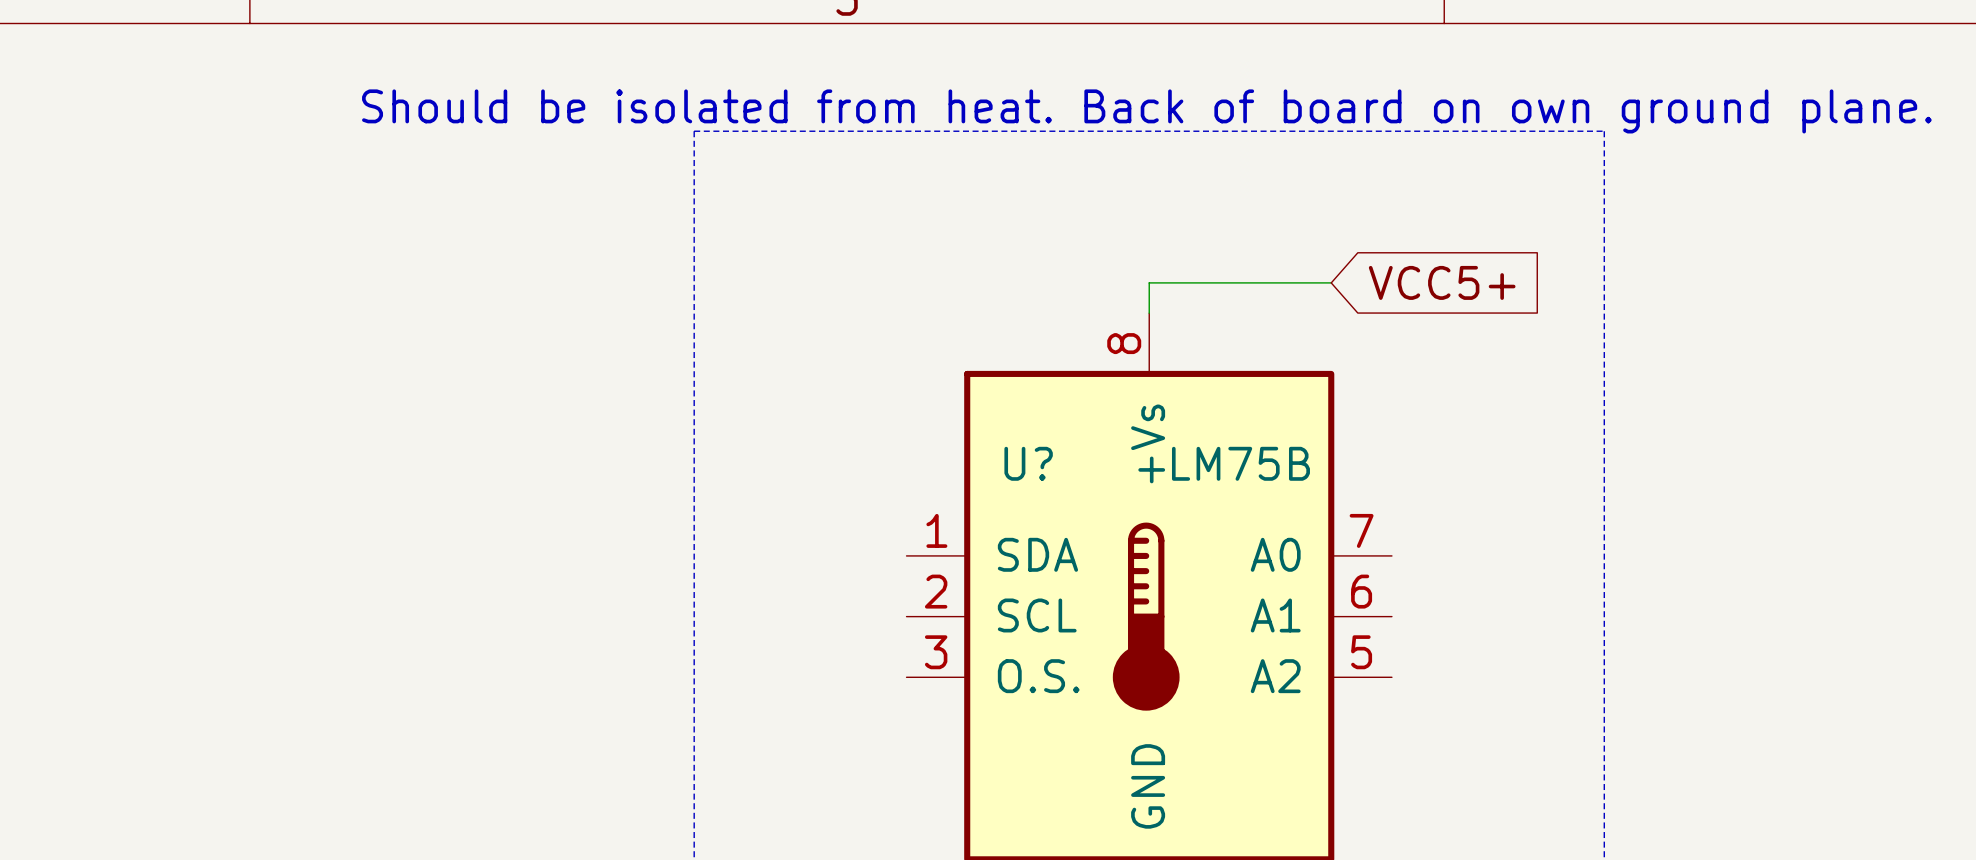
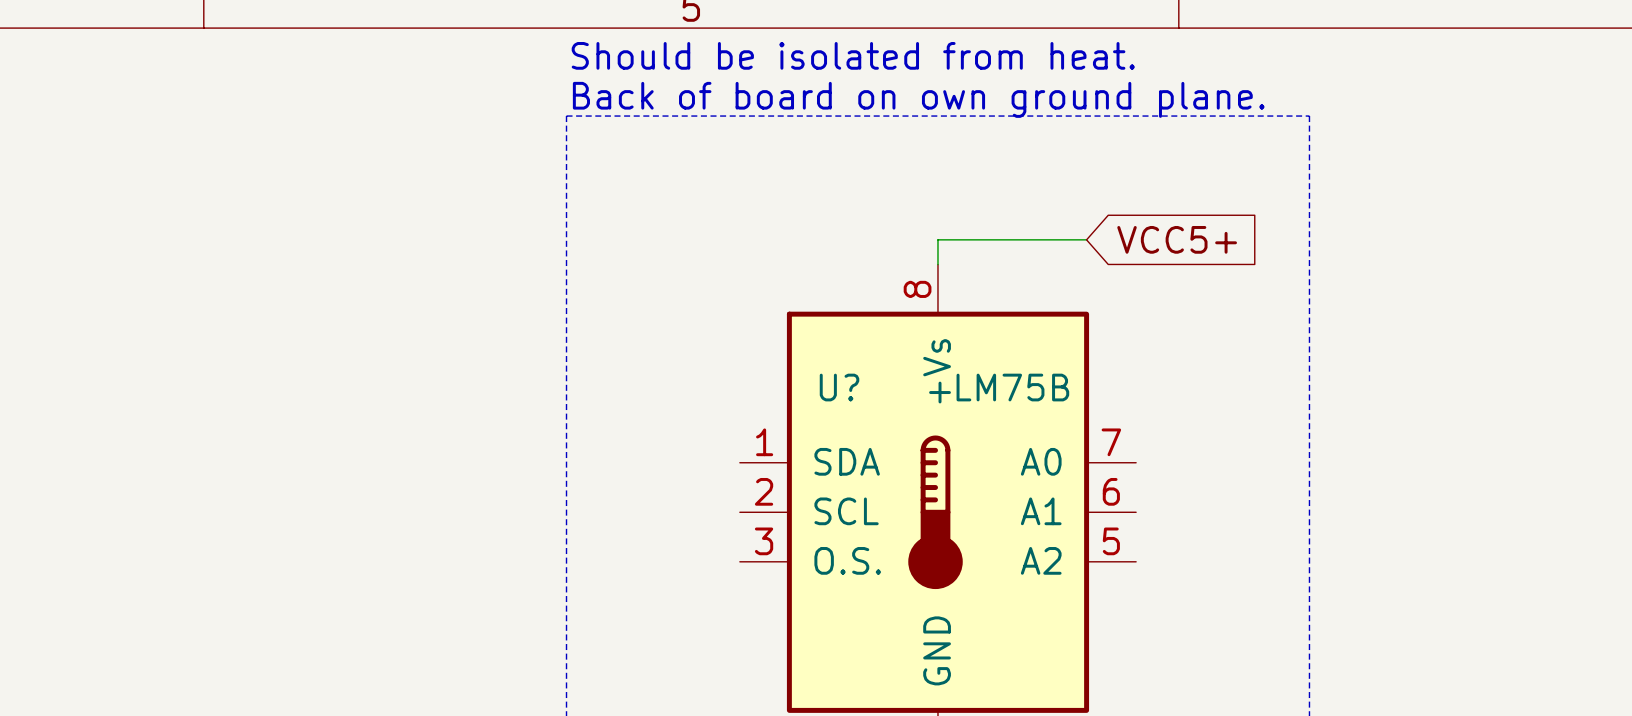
text: none -> Should be isolated from heat. (853, 55)
text: none -> Back of board on own ground plane. (918, 99)
text: Should be isolated from heat. Back of board on own ground plane. (1146, 111) -> none

